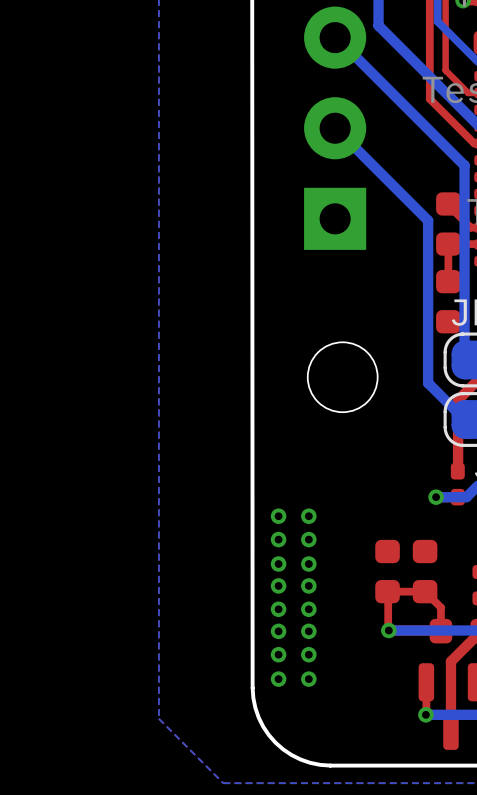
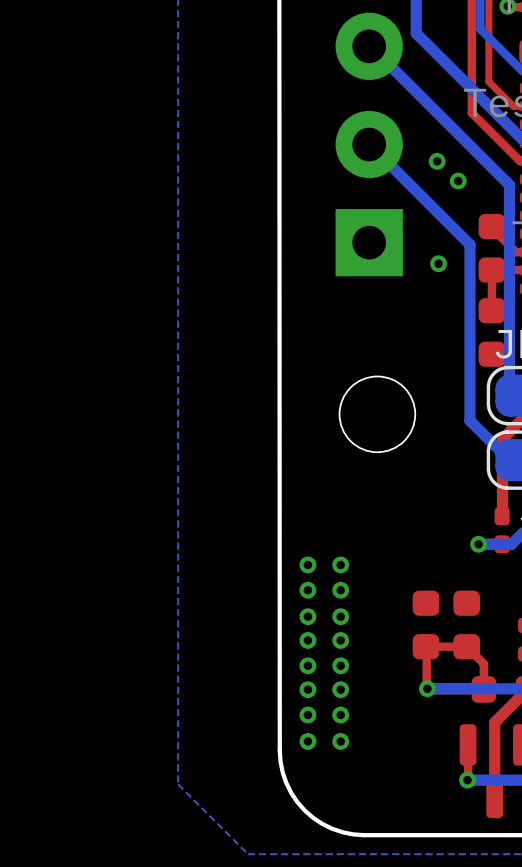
via: none -> (437, 161)
via: none -> (458, 180)
via: none -> (438, 263)

